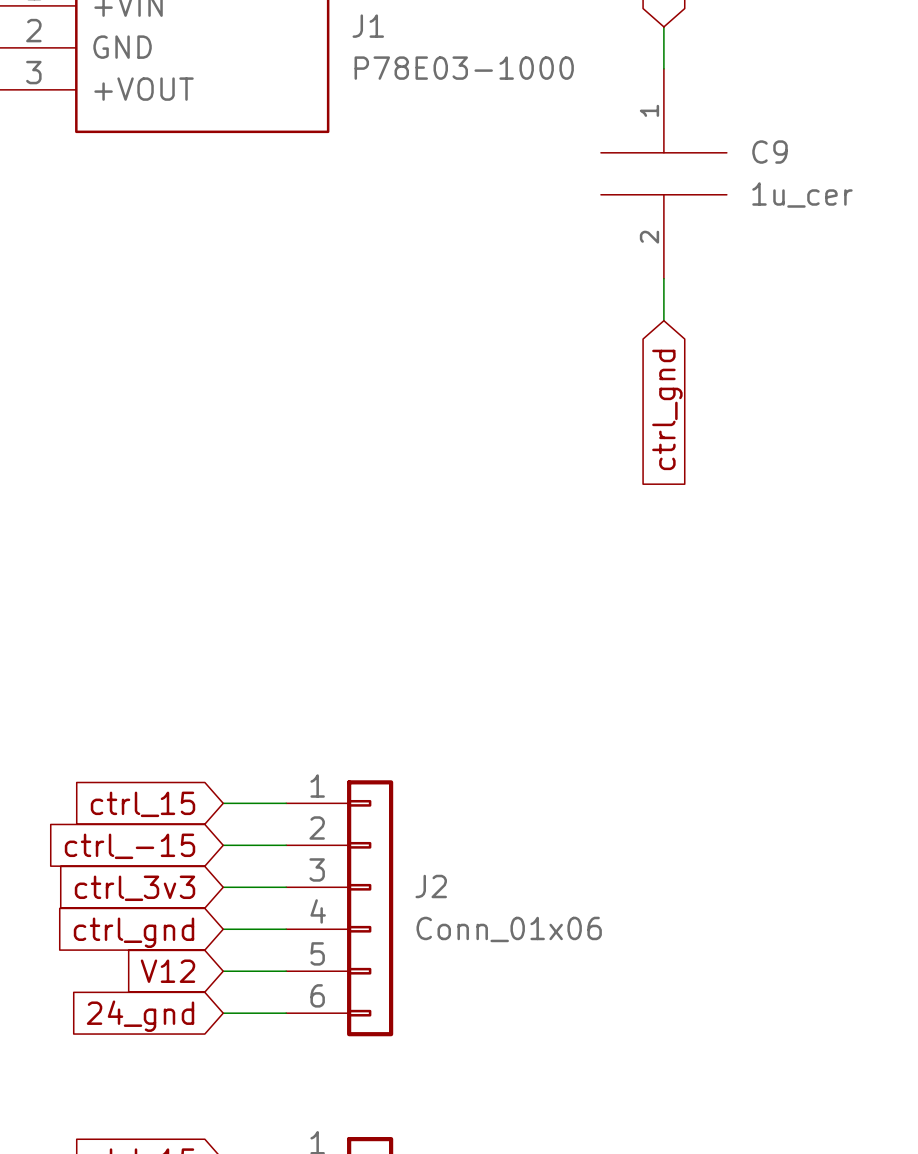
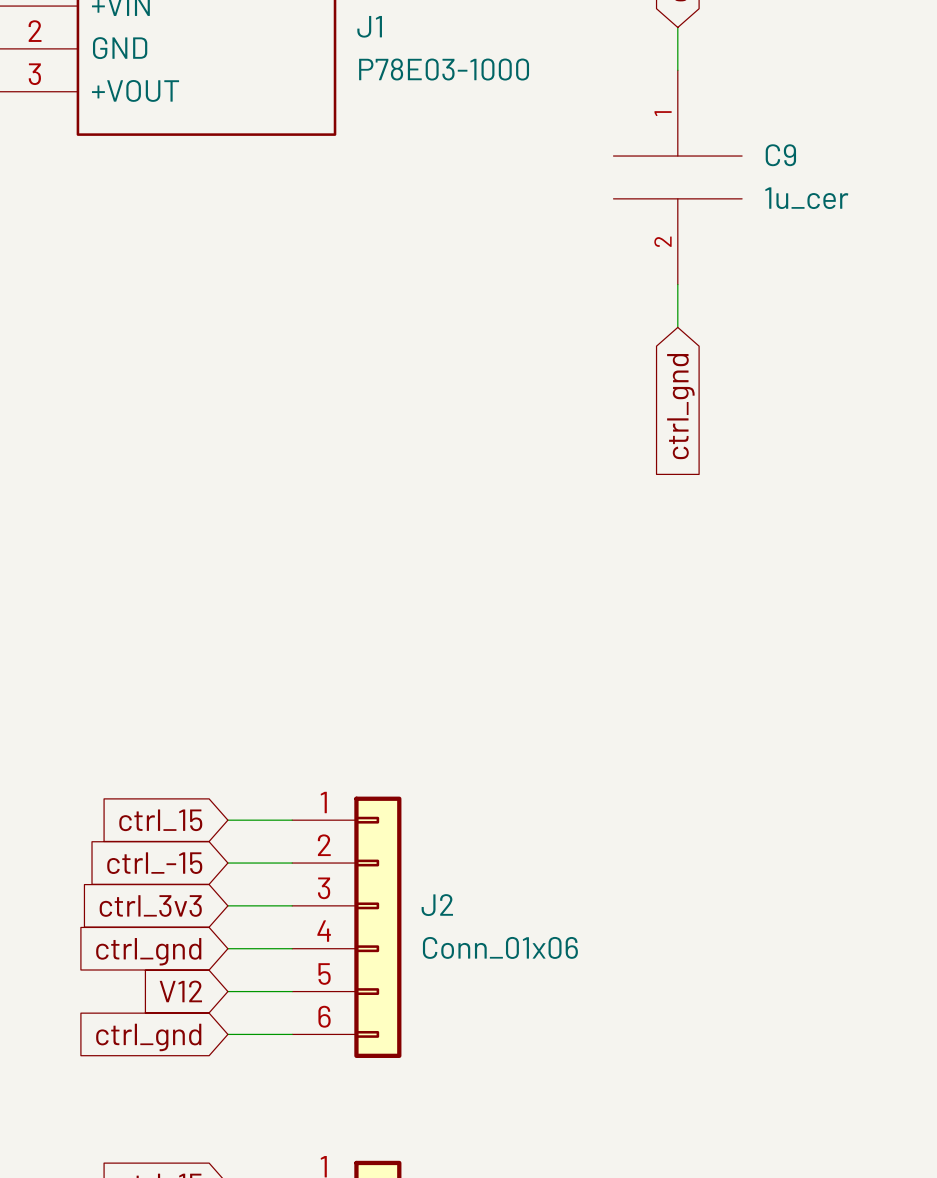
global label: 24_gnd (140, 1016) -> ctrl_gnd (148, 1037)

